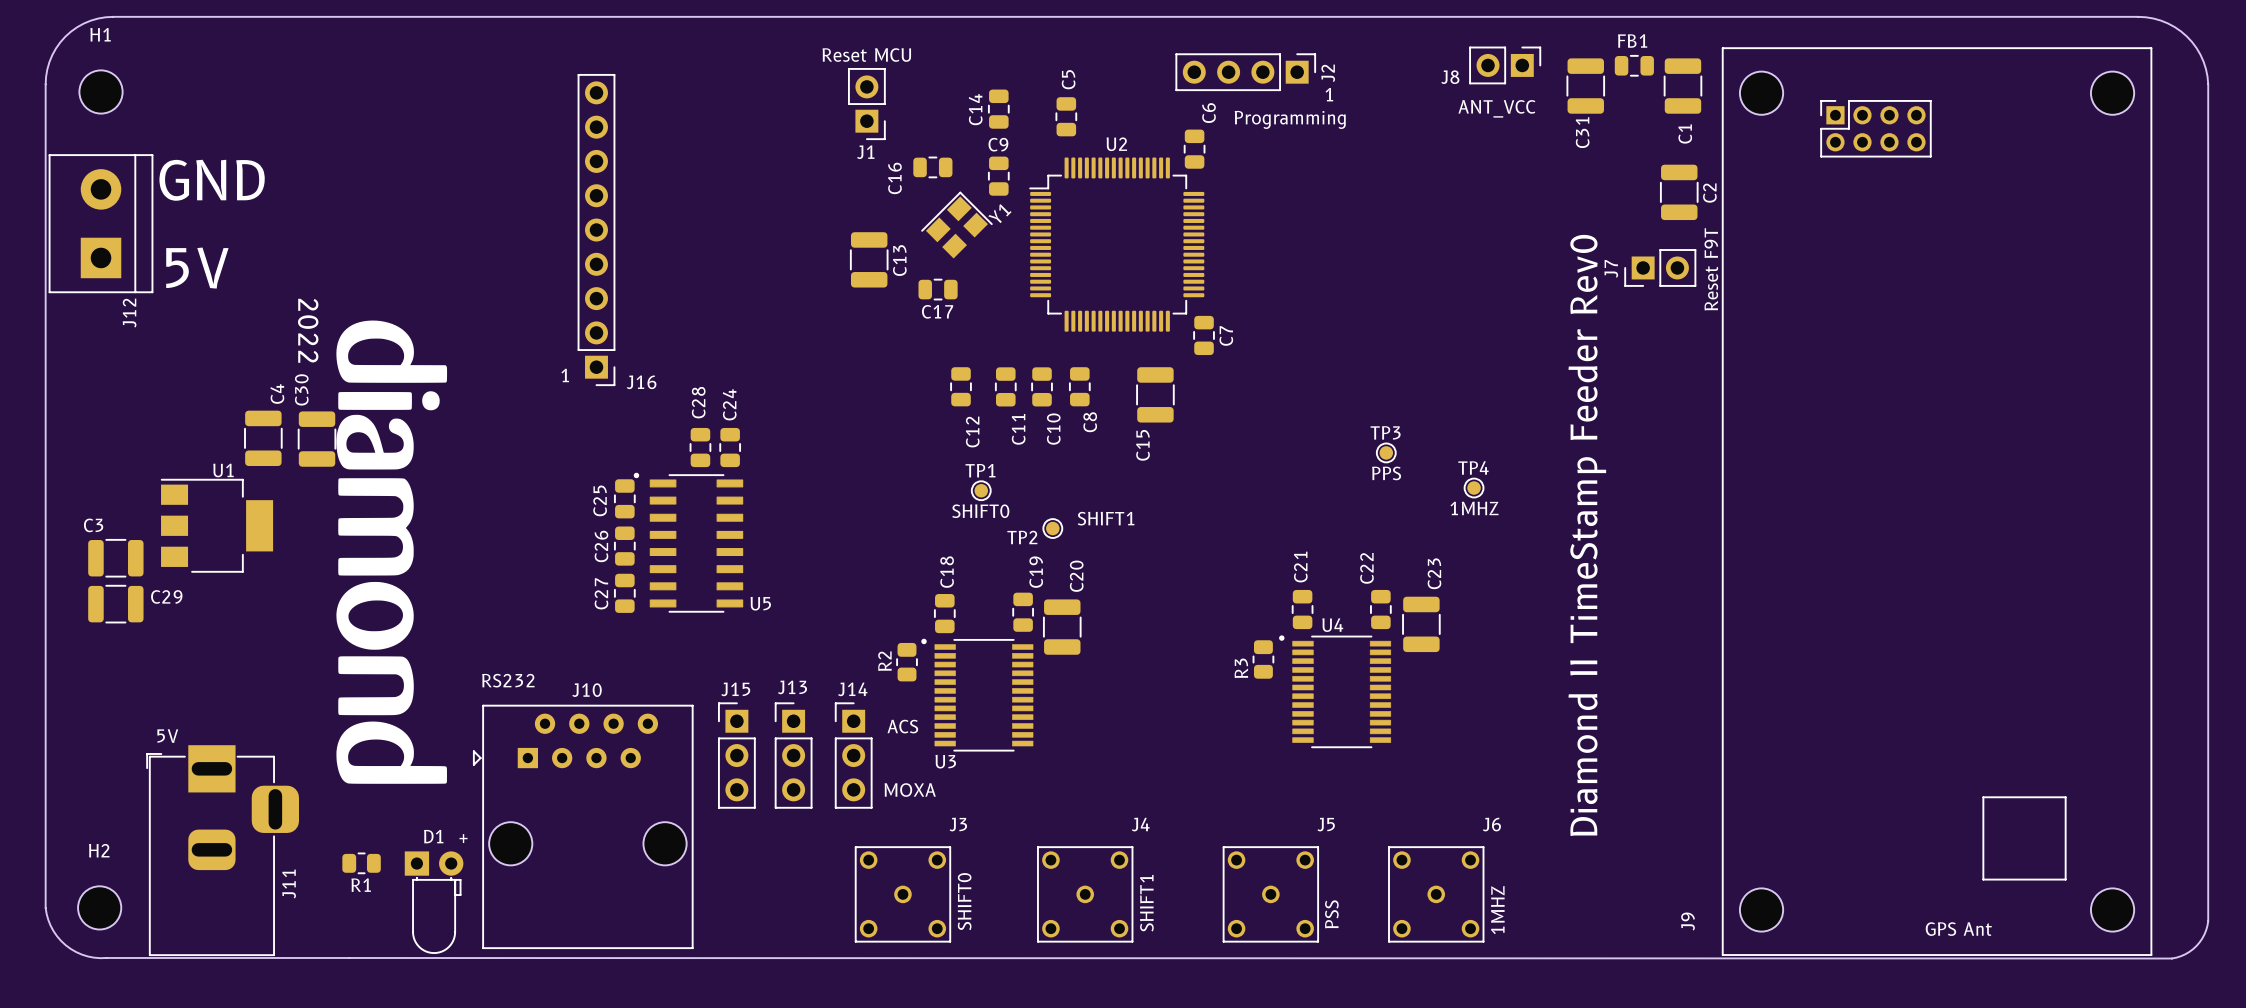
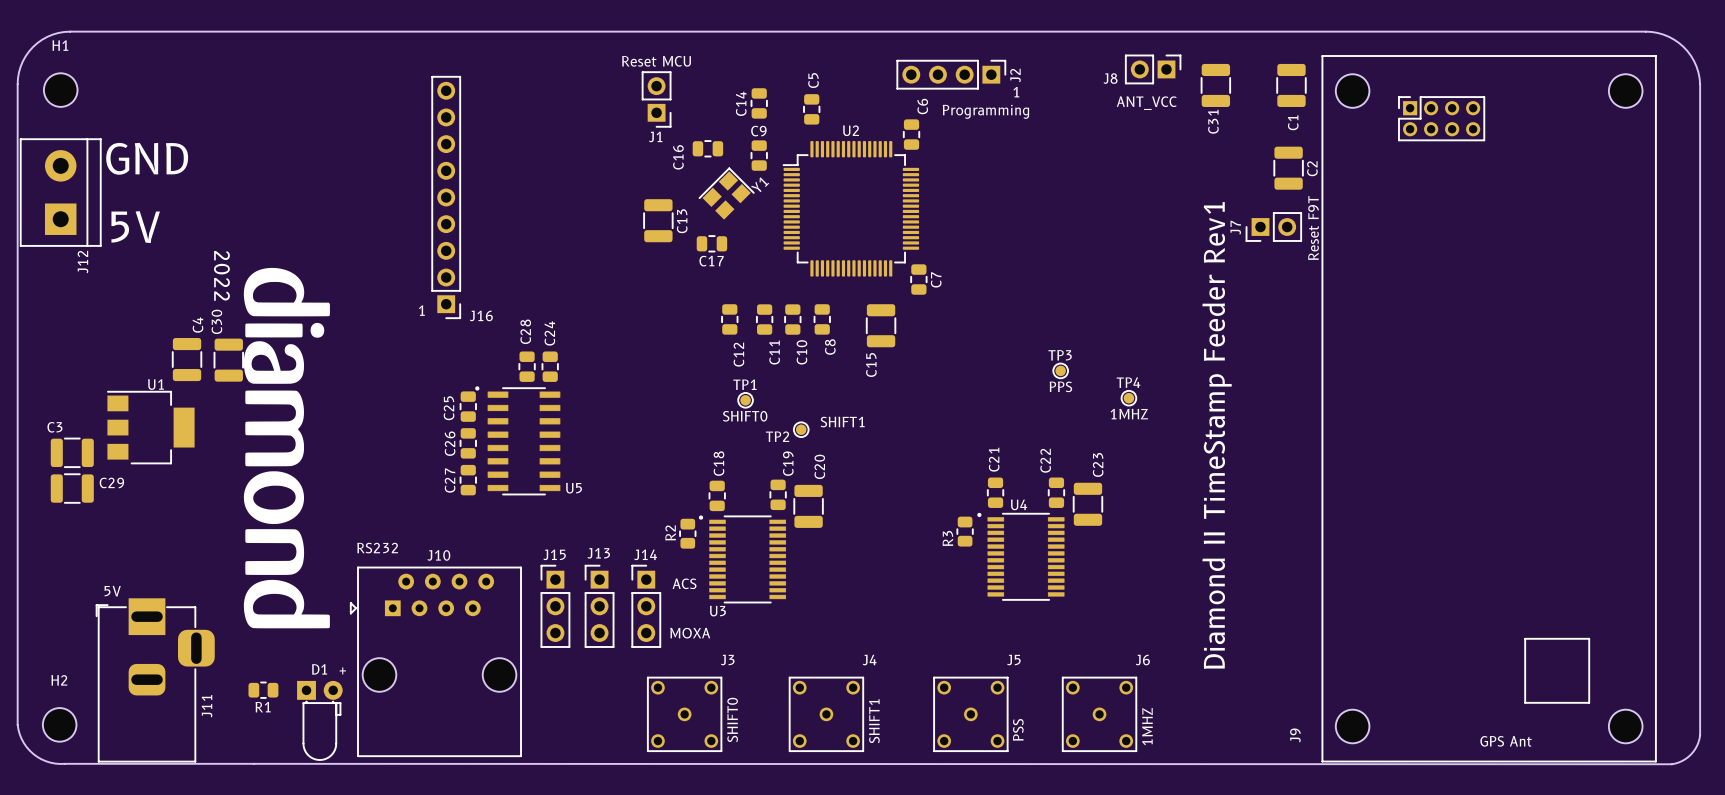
FB1: (1634, 65) -> none
text: Diamond II TimeStamp Feeder Rev0 (1587, 535) -> Diamond II TimeStamp Feeder Rev1 (1217, 435)

